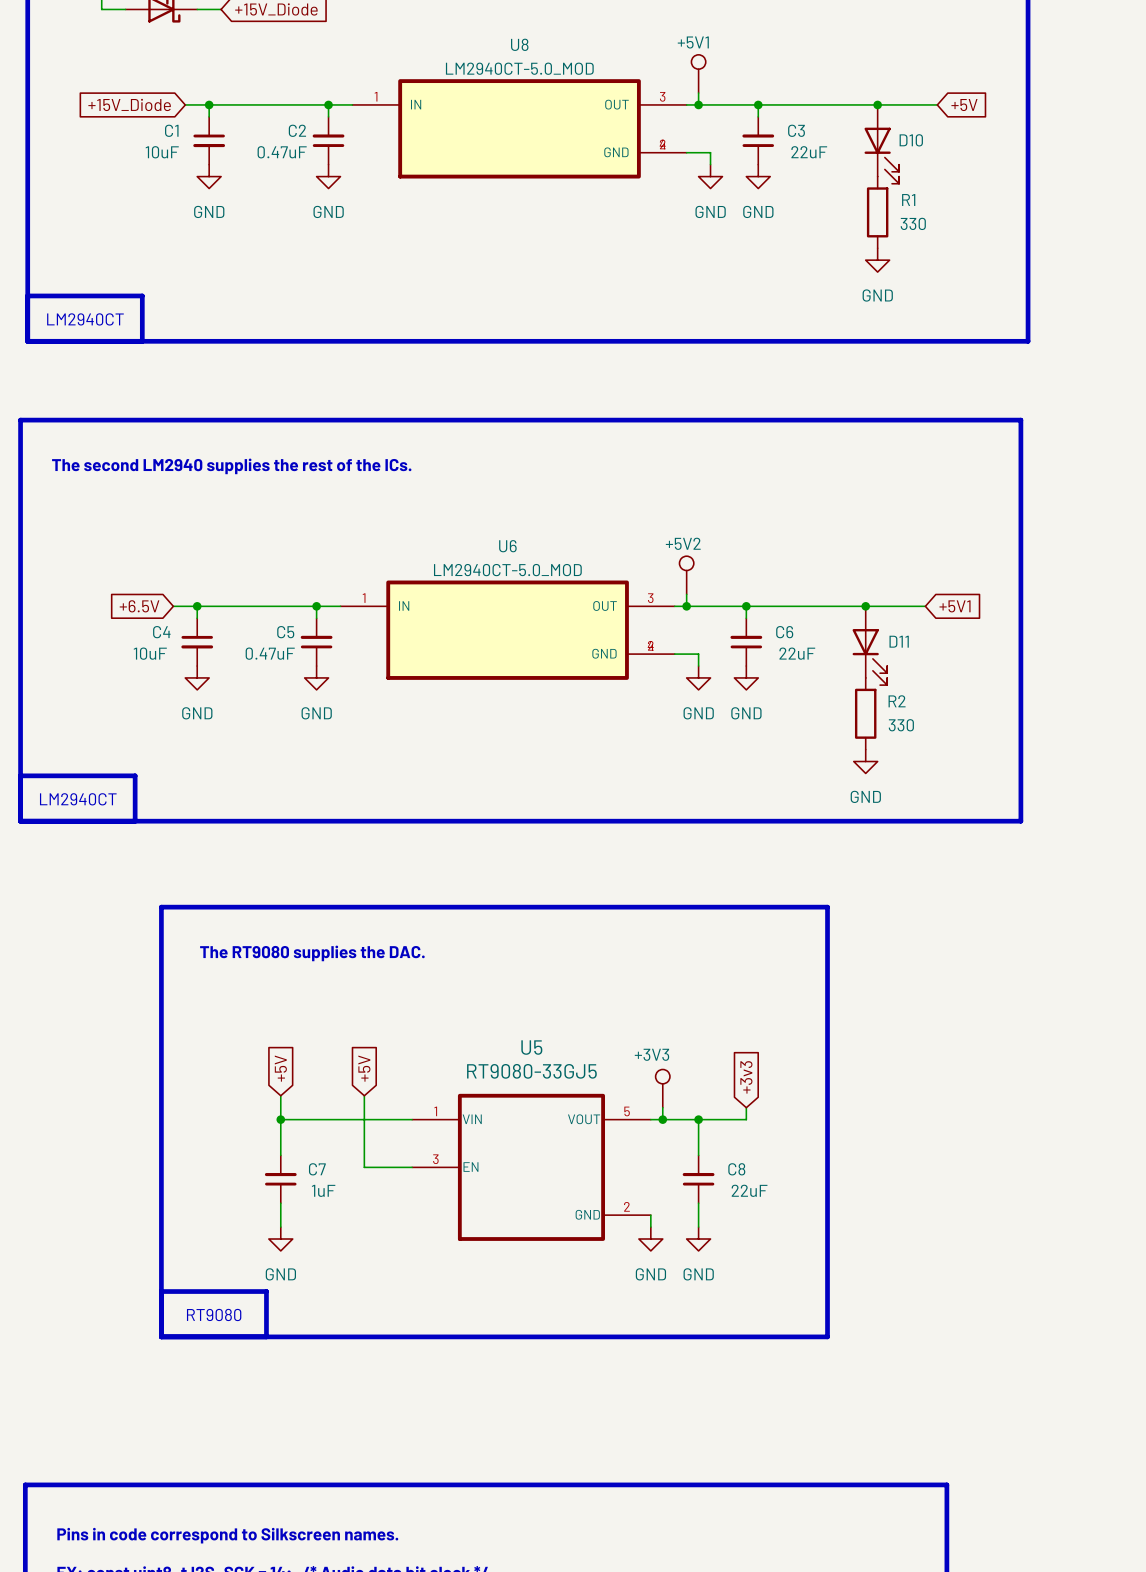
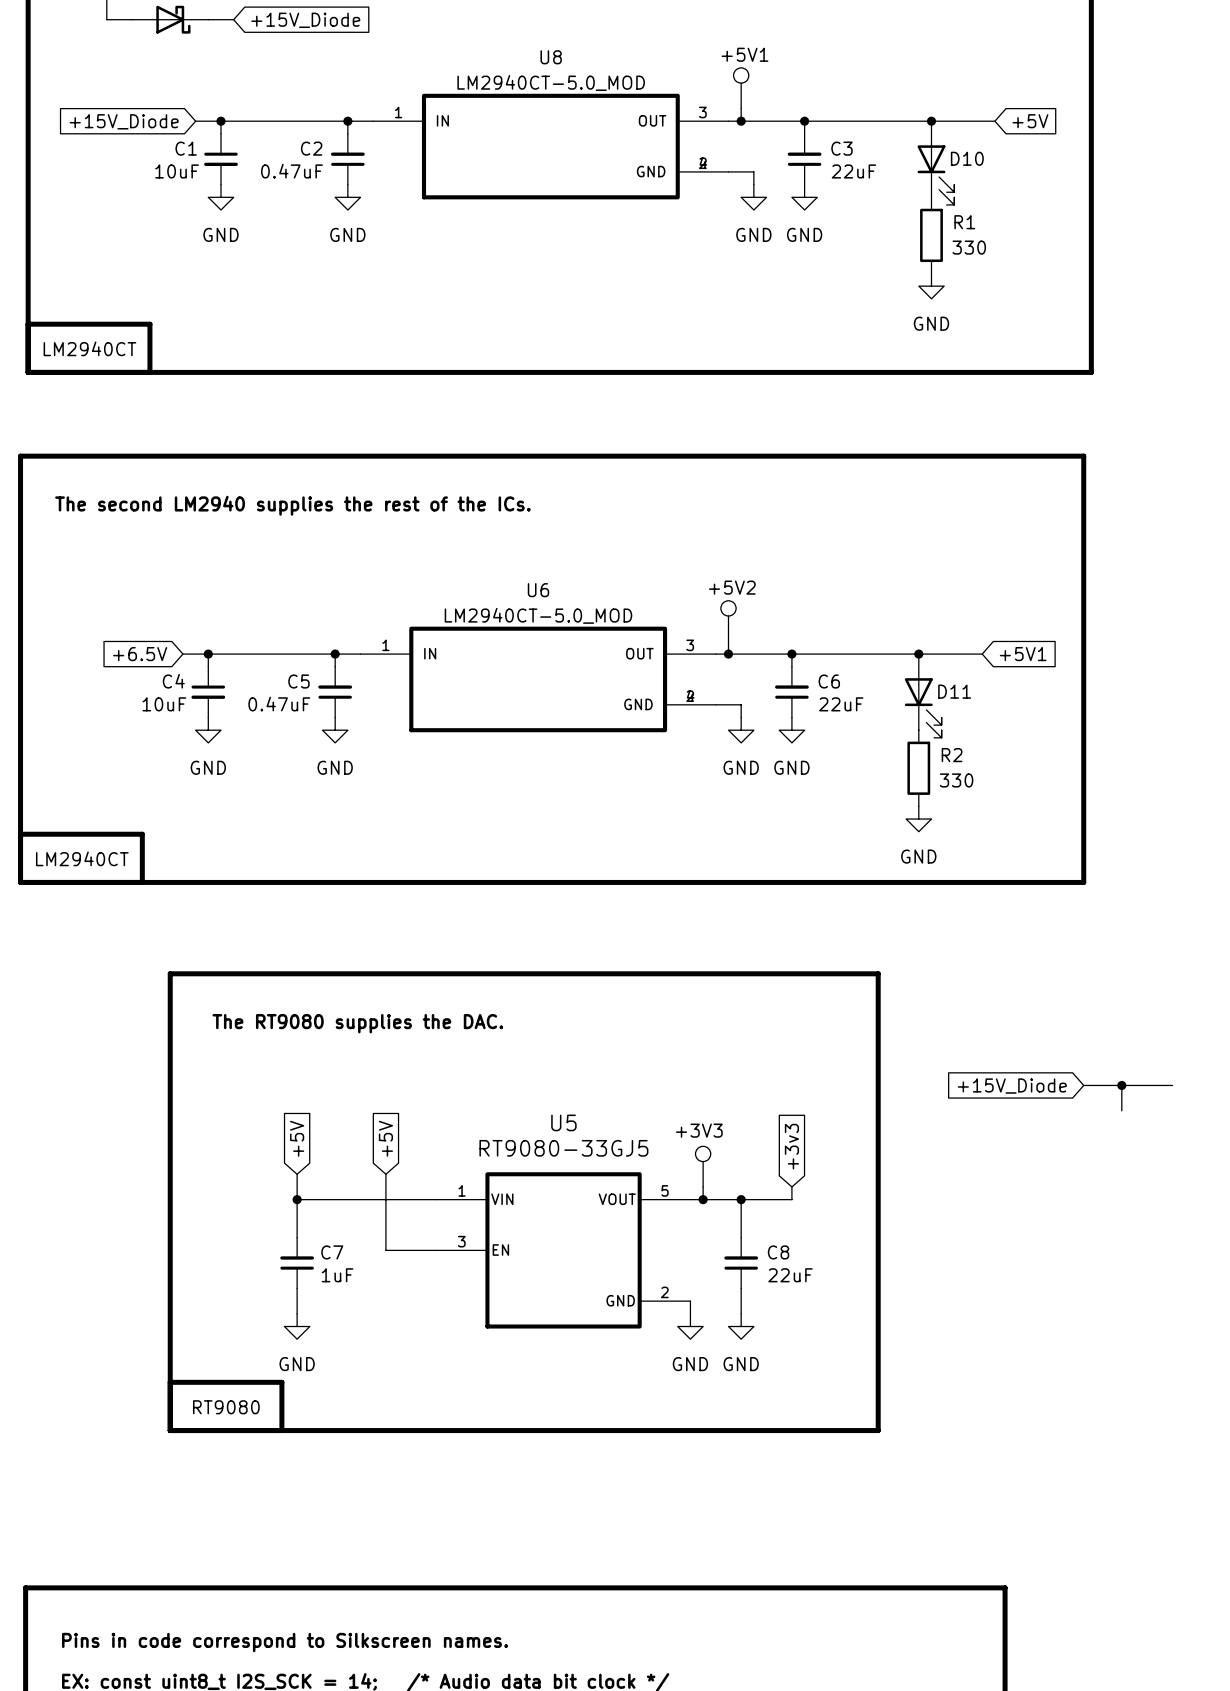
global label: none -> +15V_Diode (1012, 1086)
wire: none -> (1083, 1085) (1172, 1085)
wire: none -> (1121, 1085) (1121, 1110)
junction: none -> (1121, 1085)

